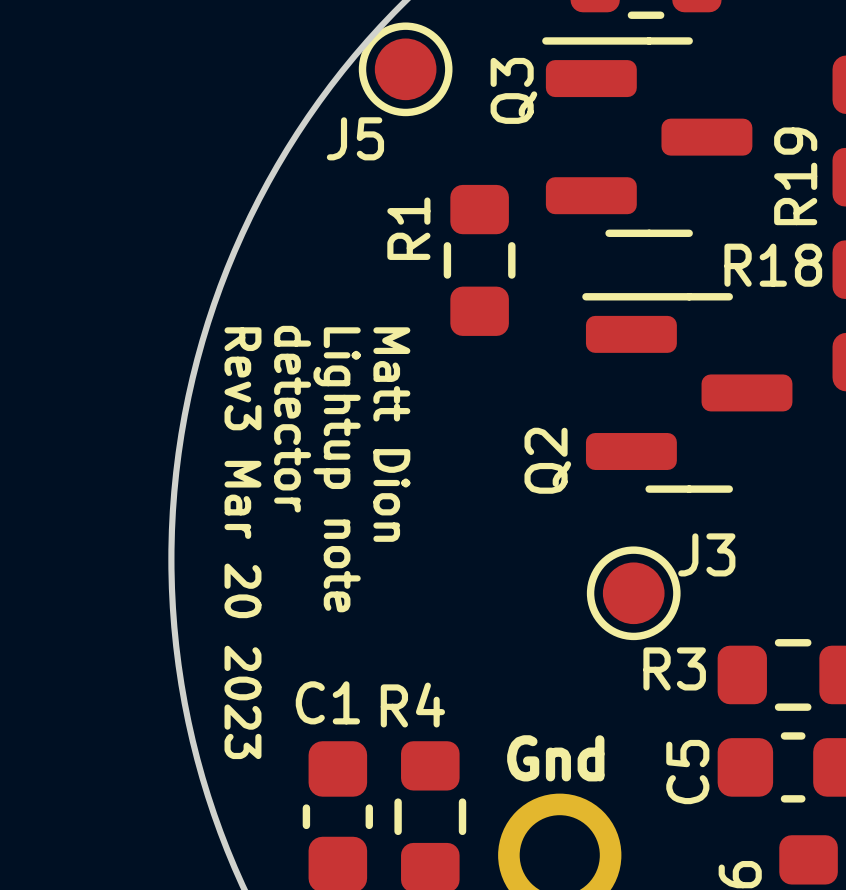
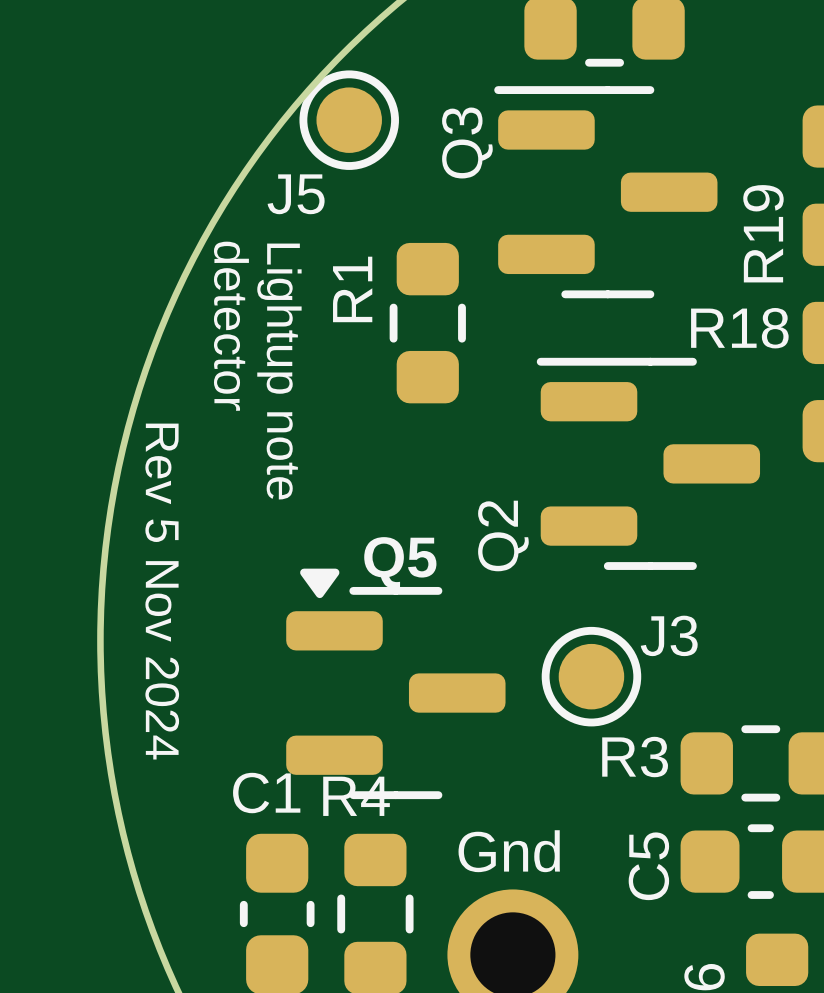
text position: detector (292, 419) -> detector (231, 326)
text: Matt Dion (391, 434) -> none
text position: Lightup note (337, 469) -> Lightup note (279, 371)
text: Rev3 Mar 20 2023 (242, 543) -> none
text: none -> Rev 5 Nov 2024 (162, 591)
Q5: none -> (395, 683)

